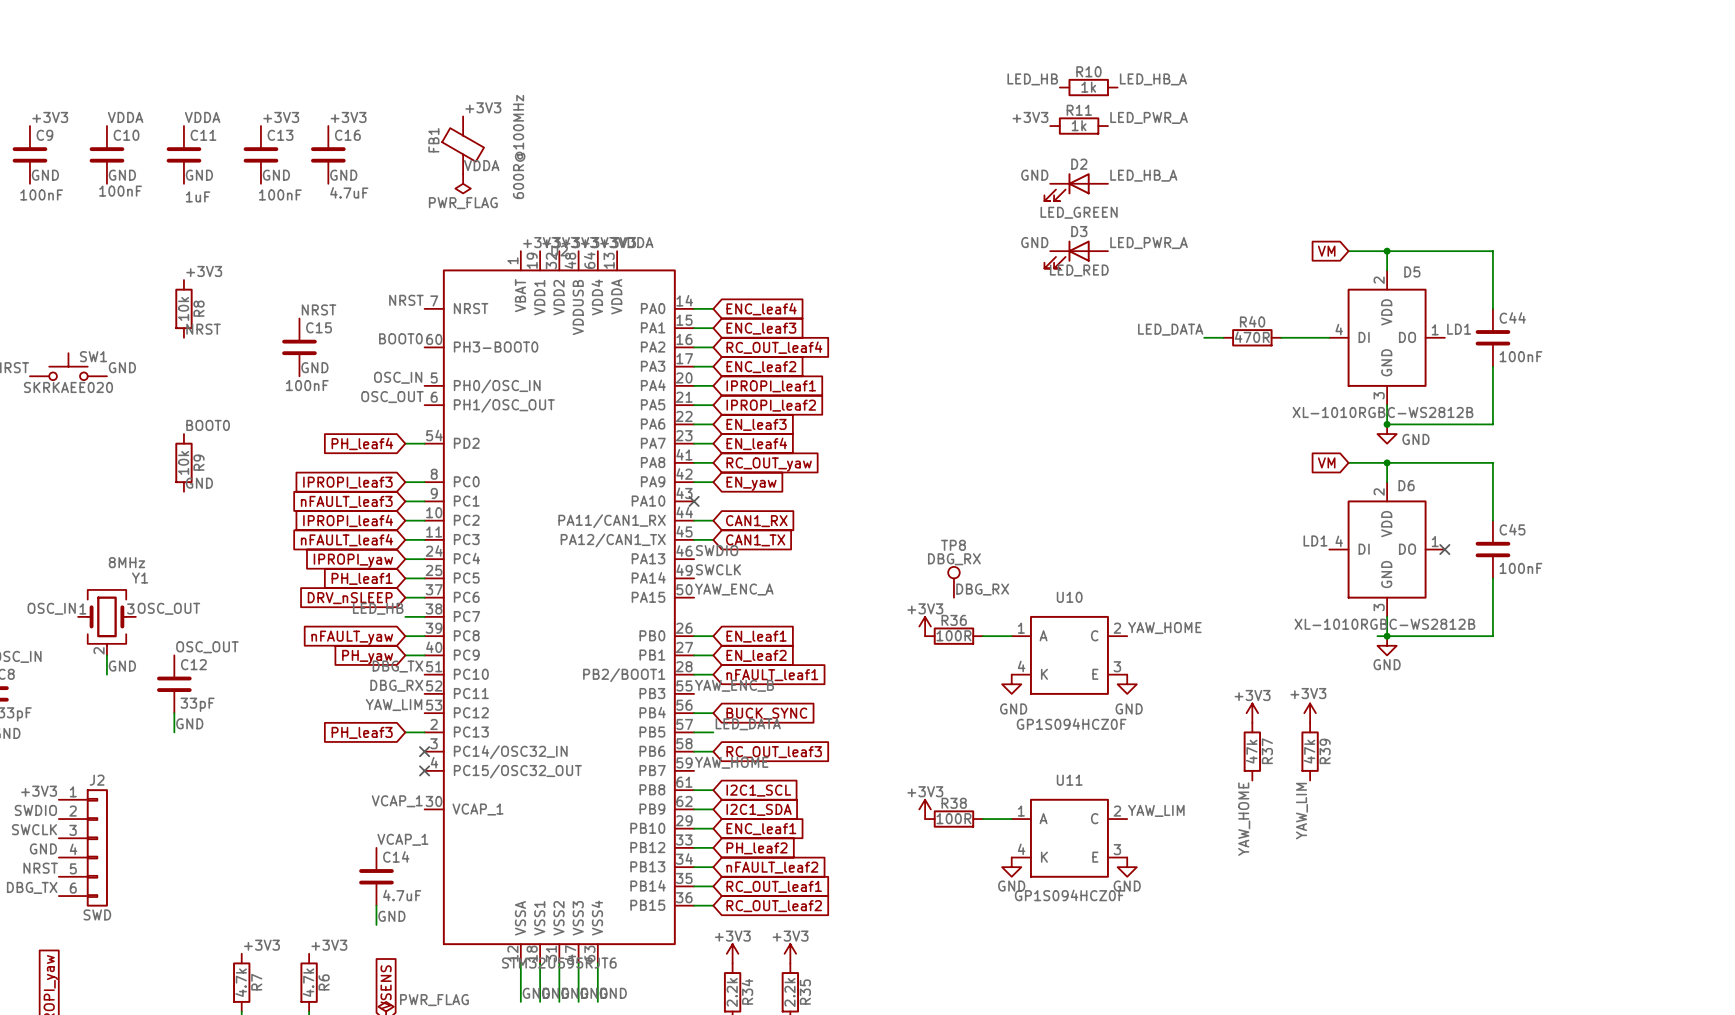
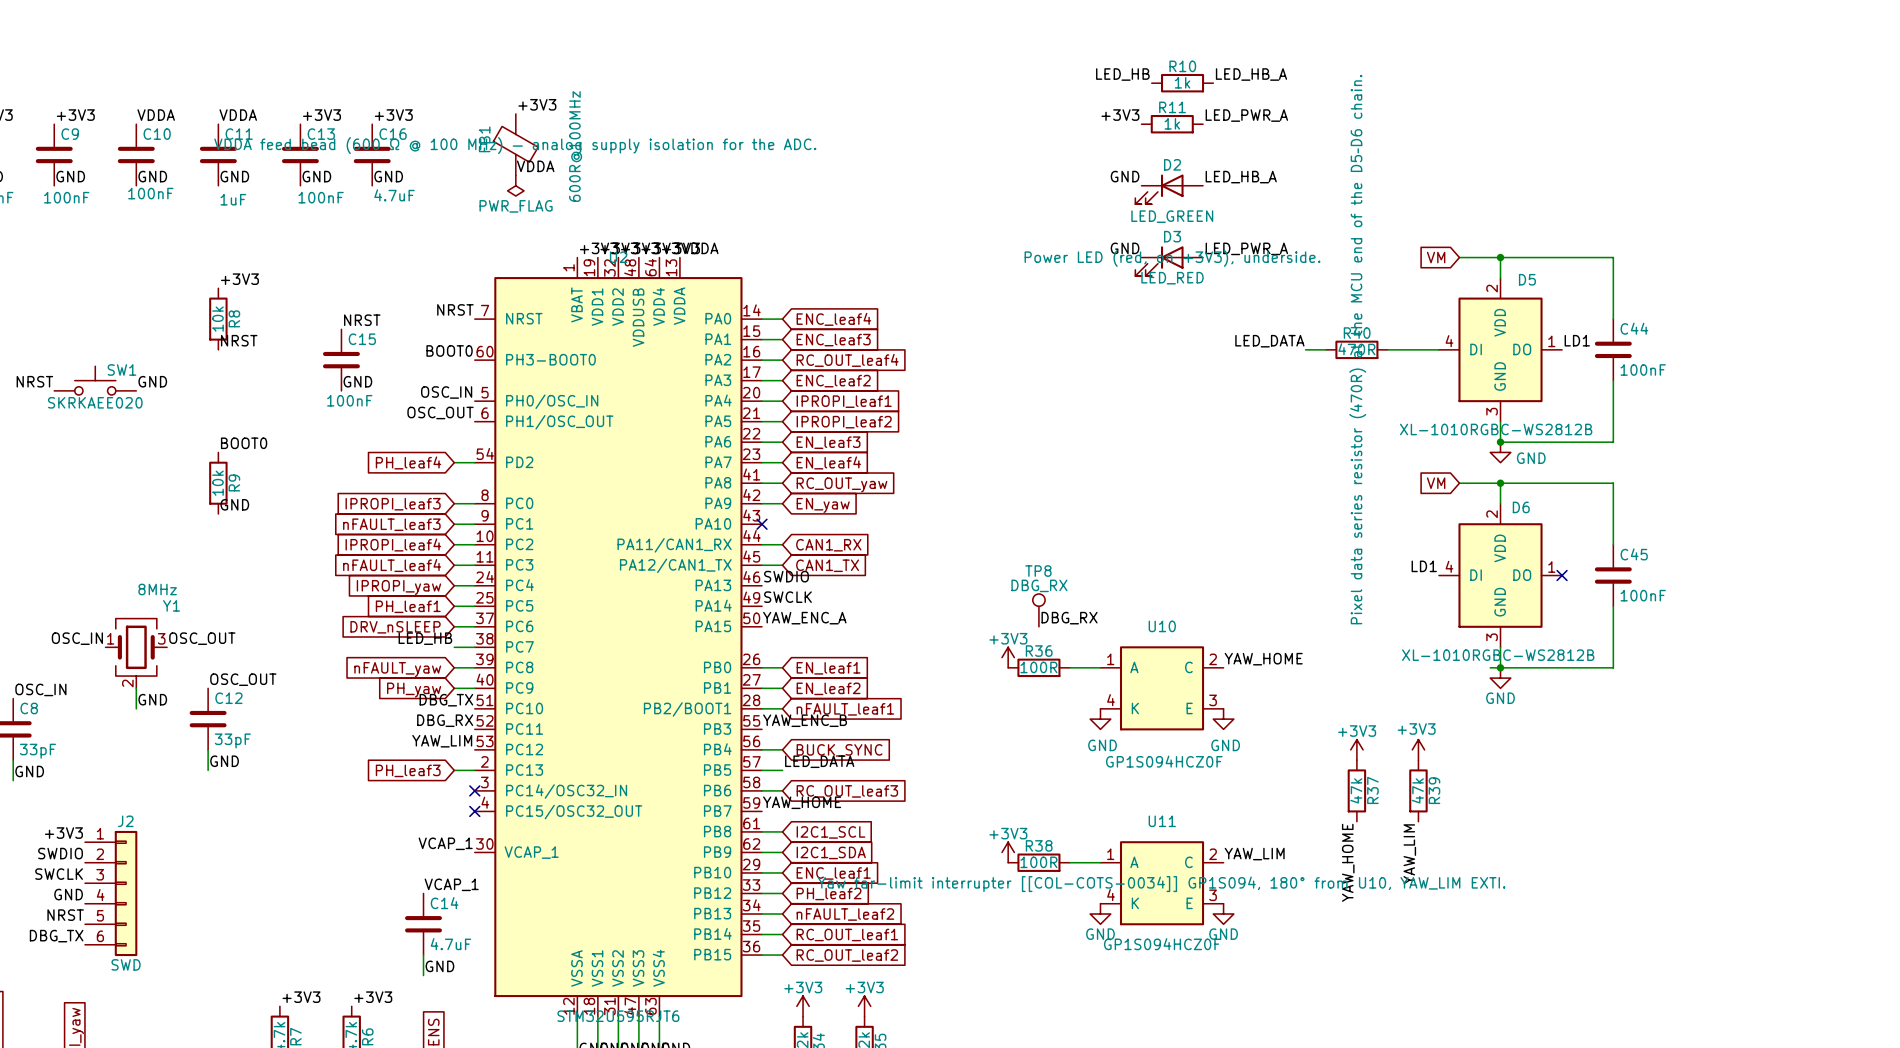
FB1 text: none -> VDDA feed bead (600 Ω @ 100 MHz) — analog supply isolation for the ADC. (515, 145)
D3 text: none -> Power LED (red, on +3V3), underside. (1172, 258)
R40 text: none -> Pixel data series resistor (470R) at the MCU end of the D5–D6 chain. (1357, 349)
U11 text: none -> Yaw far-limit interrupter [[COL-COTS-0034]] GP1S094, 180° from U10, YAW_LIM EXTI. (1161, 884)

